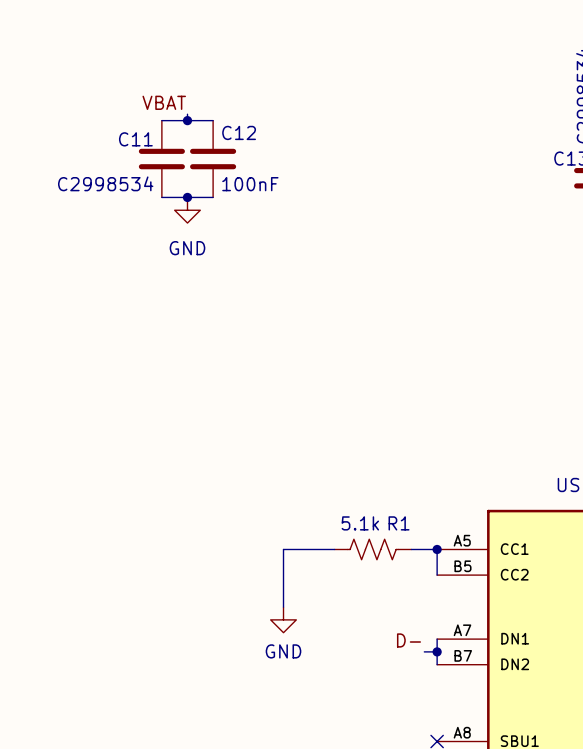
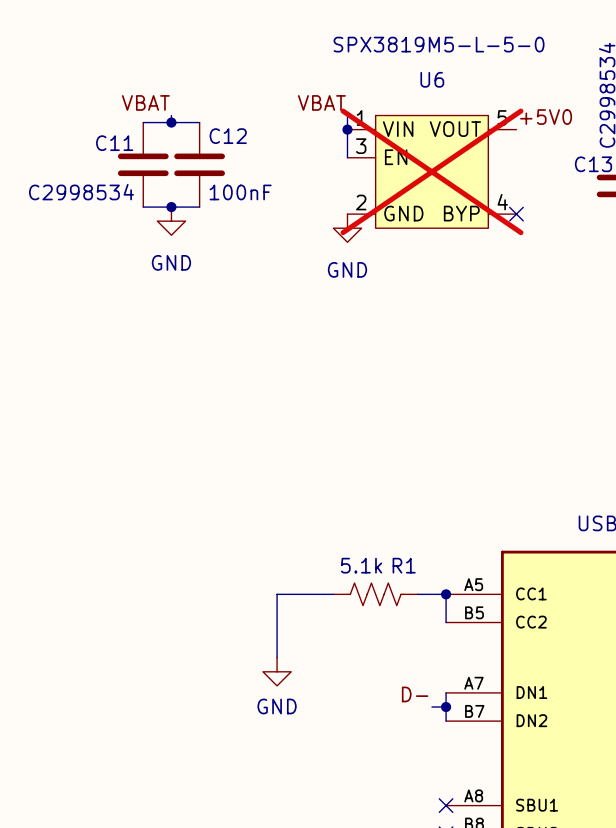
label: none -> VBAT (321, 102)
wire: none -> (347, 115) (347, 157)
label: none -> +5V0 (546, 117)
junction: none -> (347, 129)
U6: none -> SPX3819M5-L-5-0 (431, 171)
no-connect mark: none -> (516, 214)
power symbol: none -> GND (347, 228)

